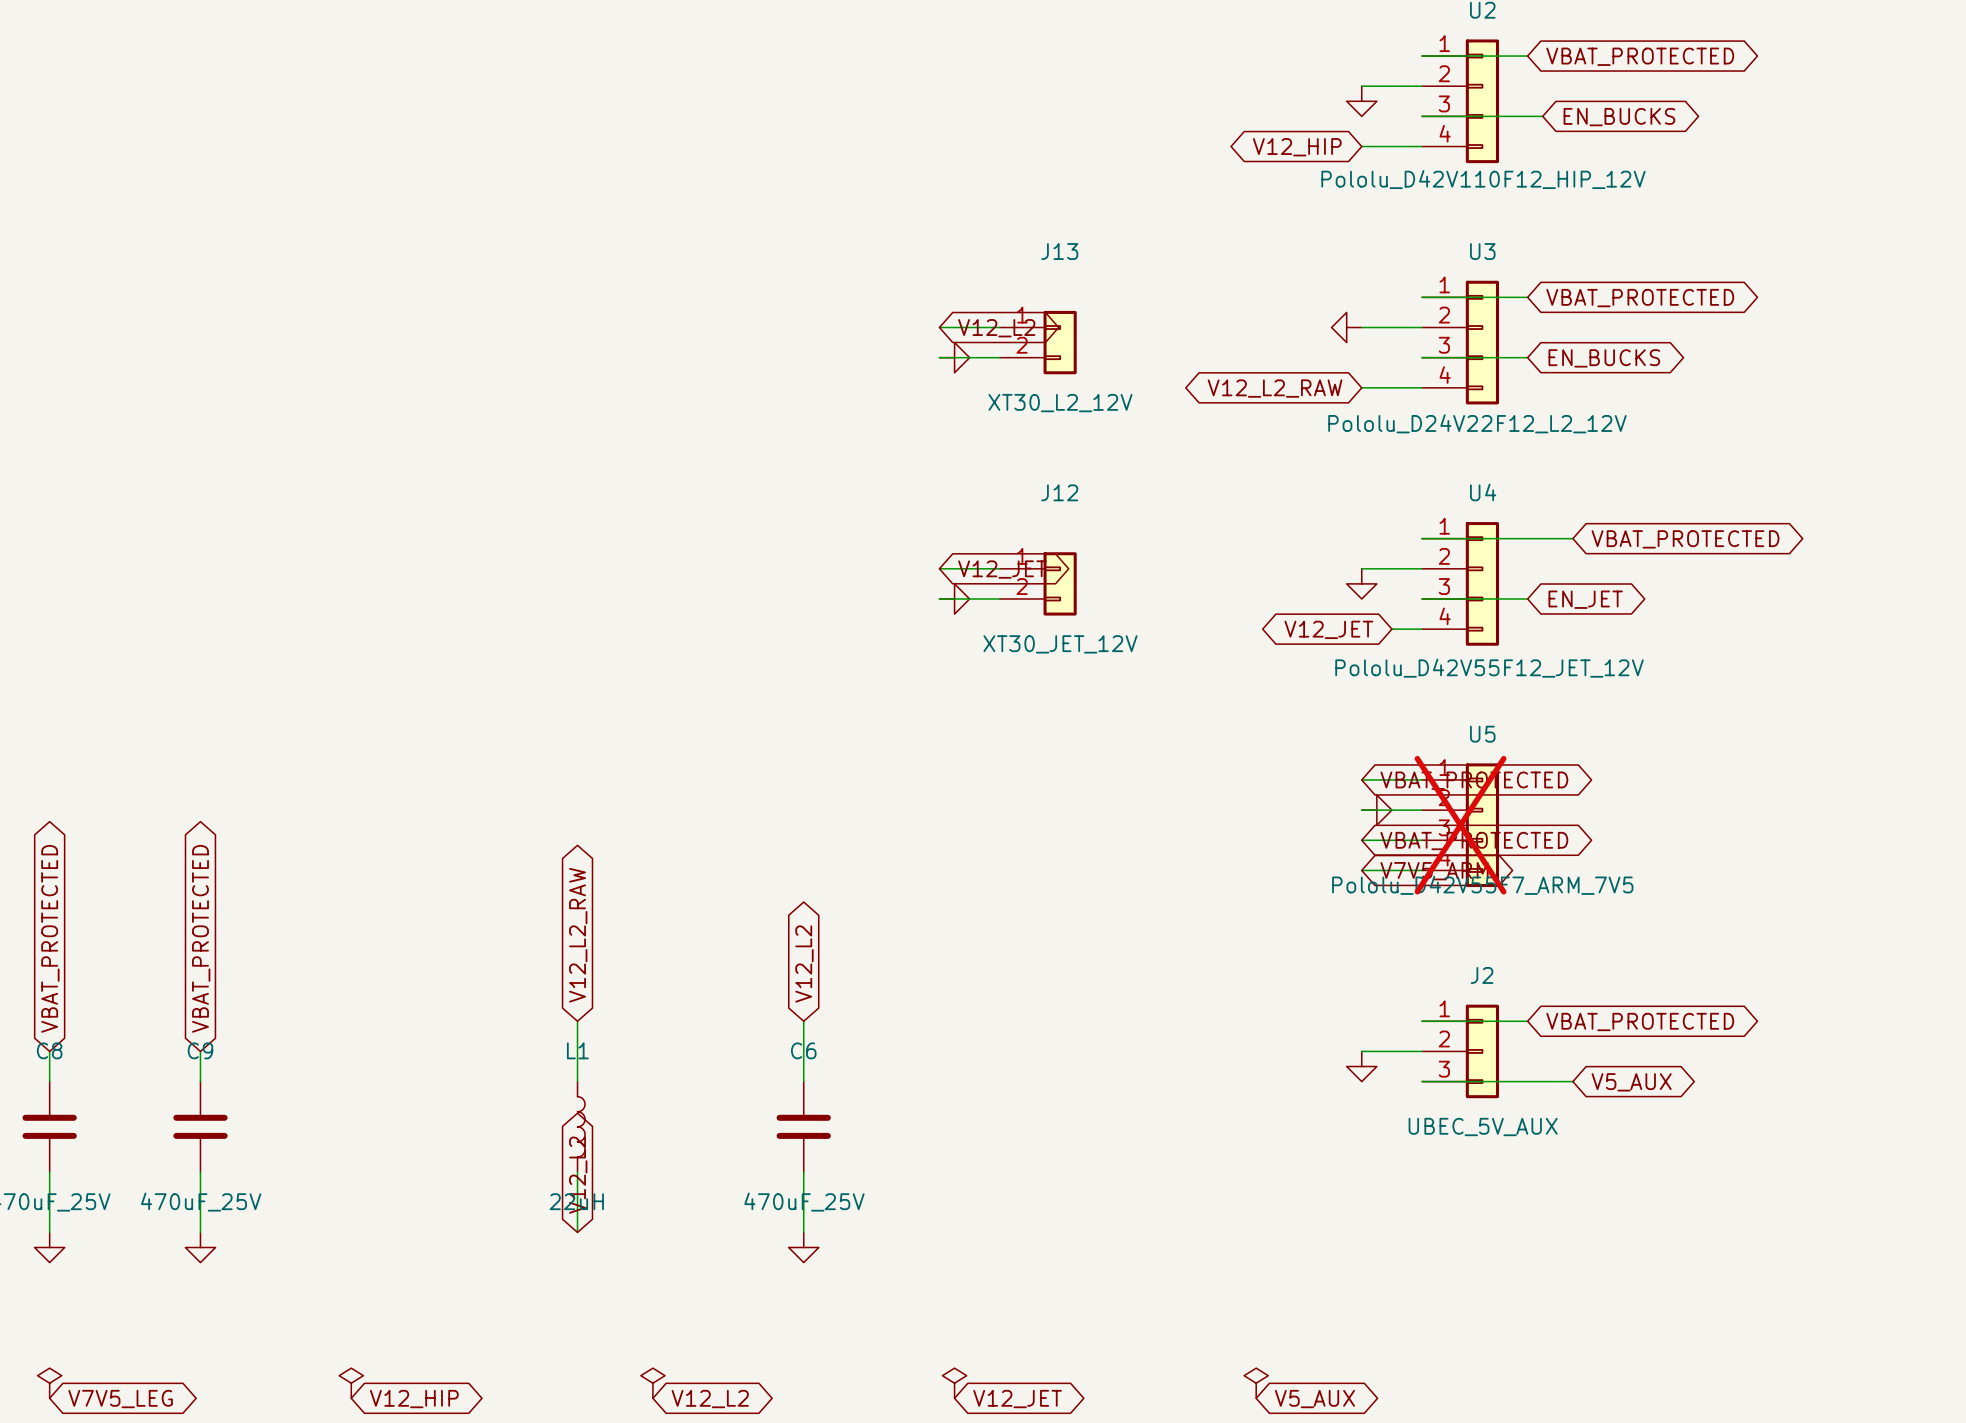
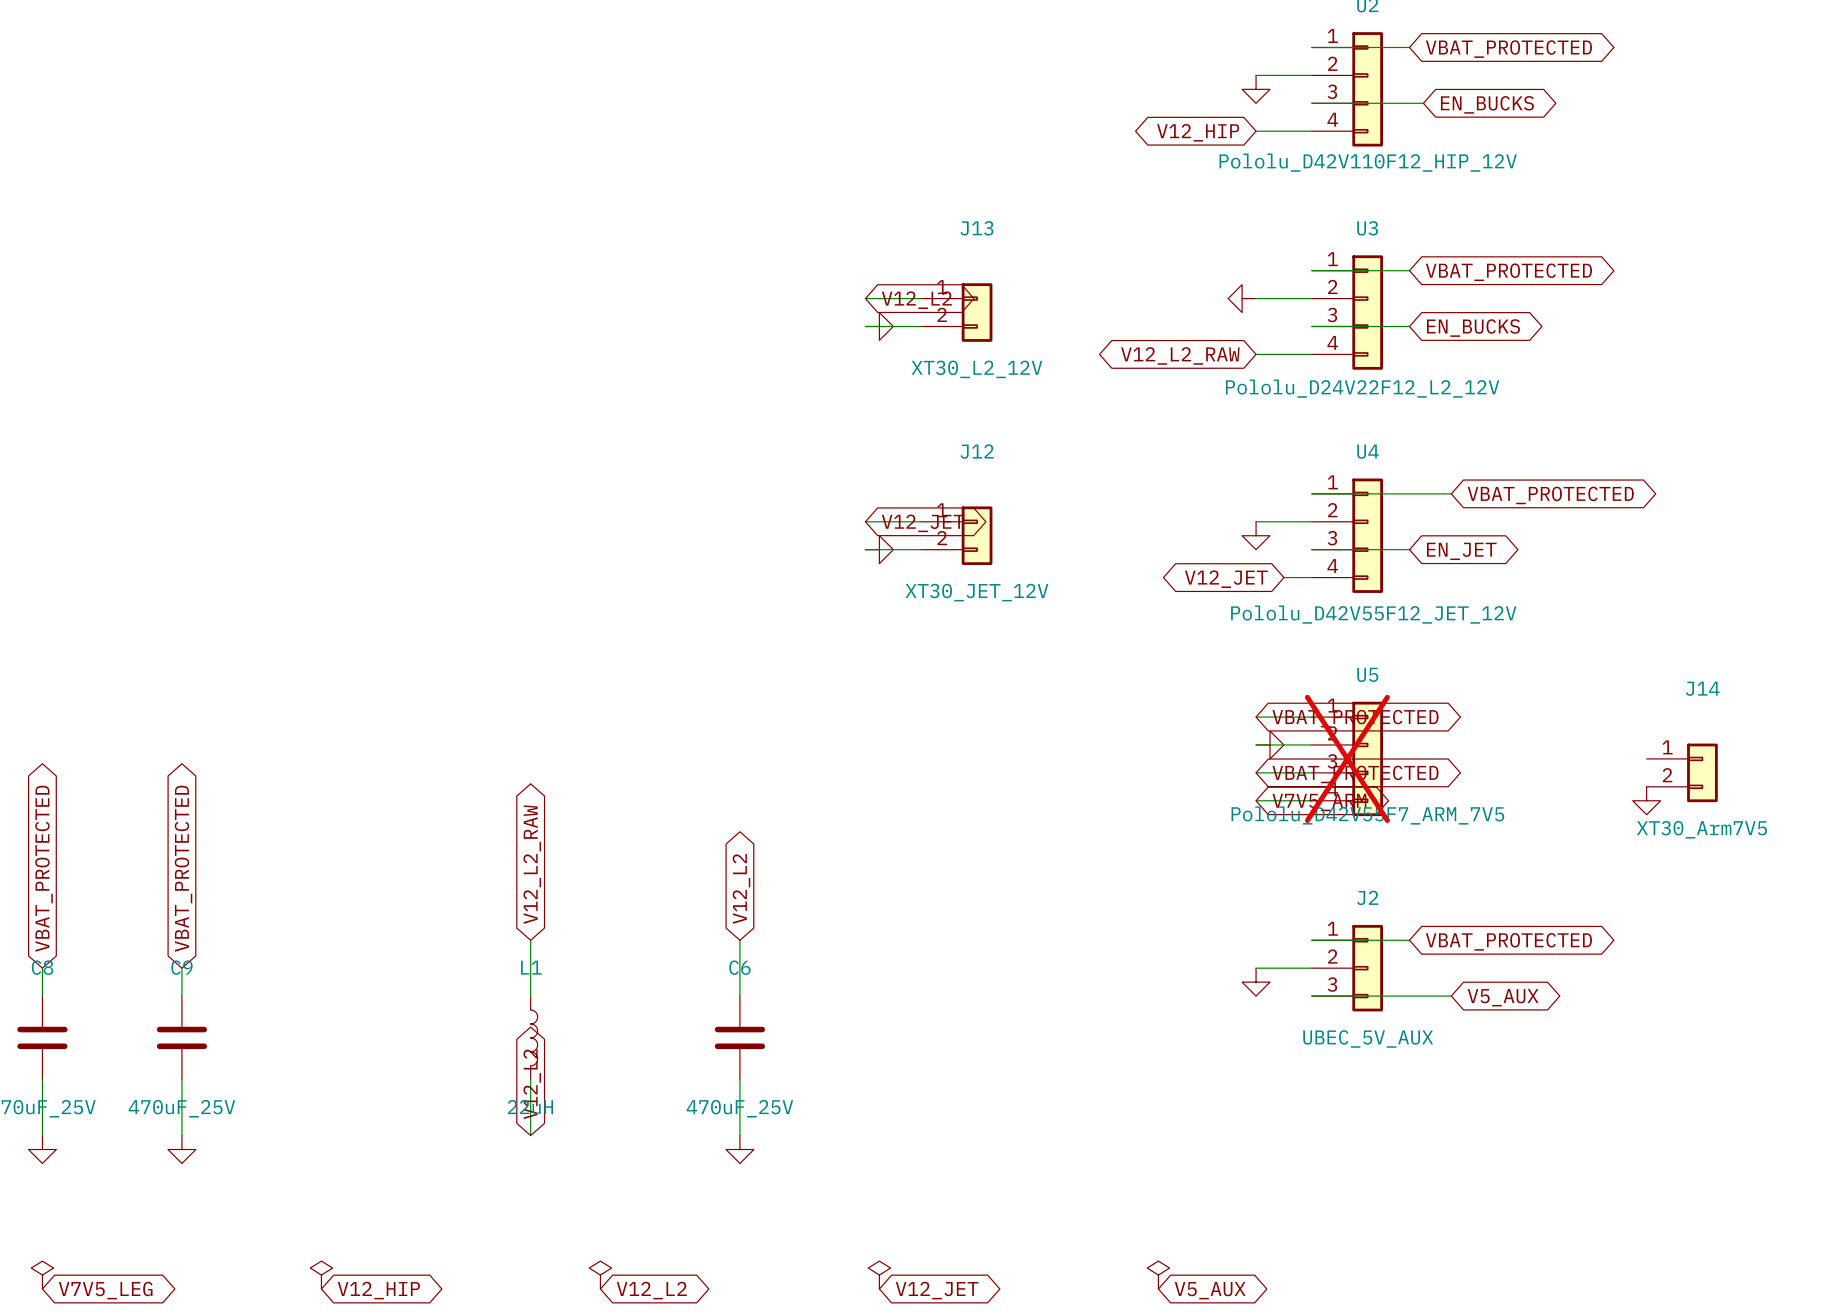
J14: none -> XT30_Arm7V5 (1682, 772)
power symbol: none -> (1646, 800)

